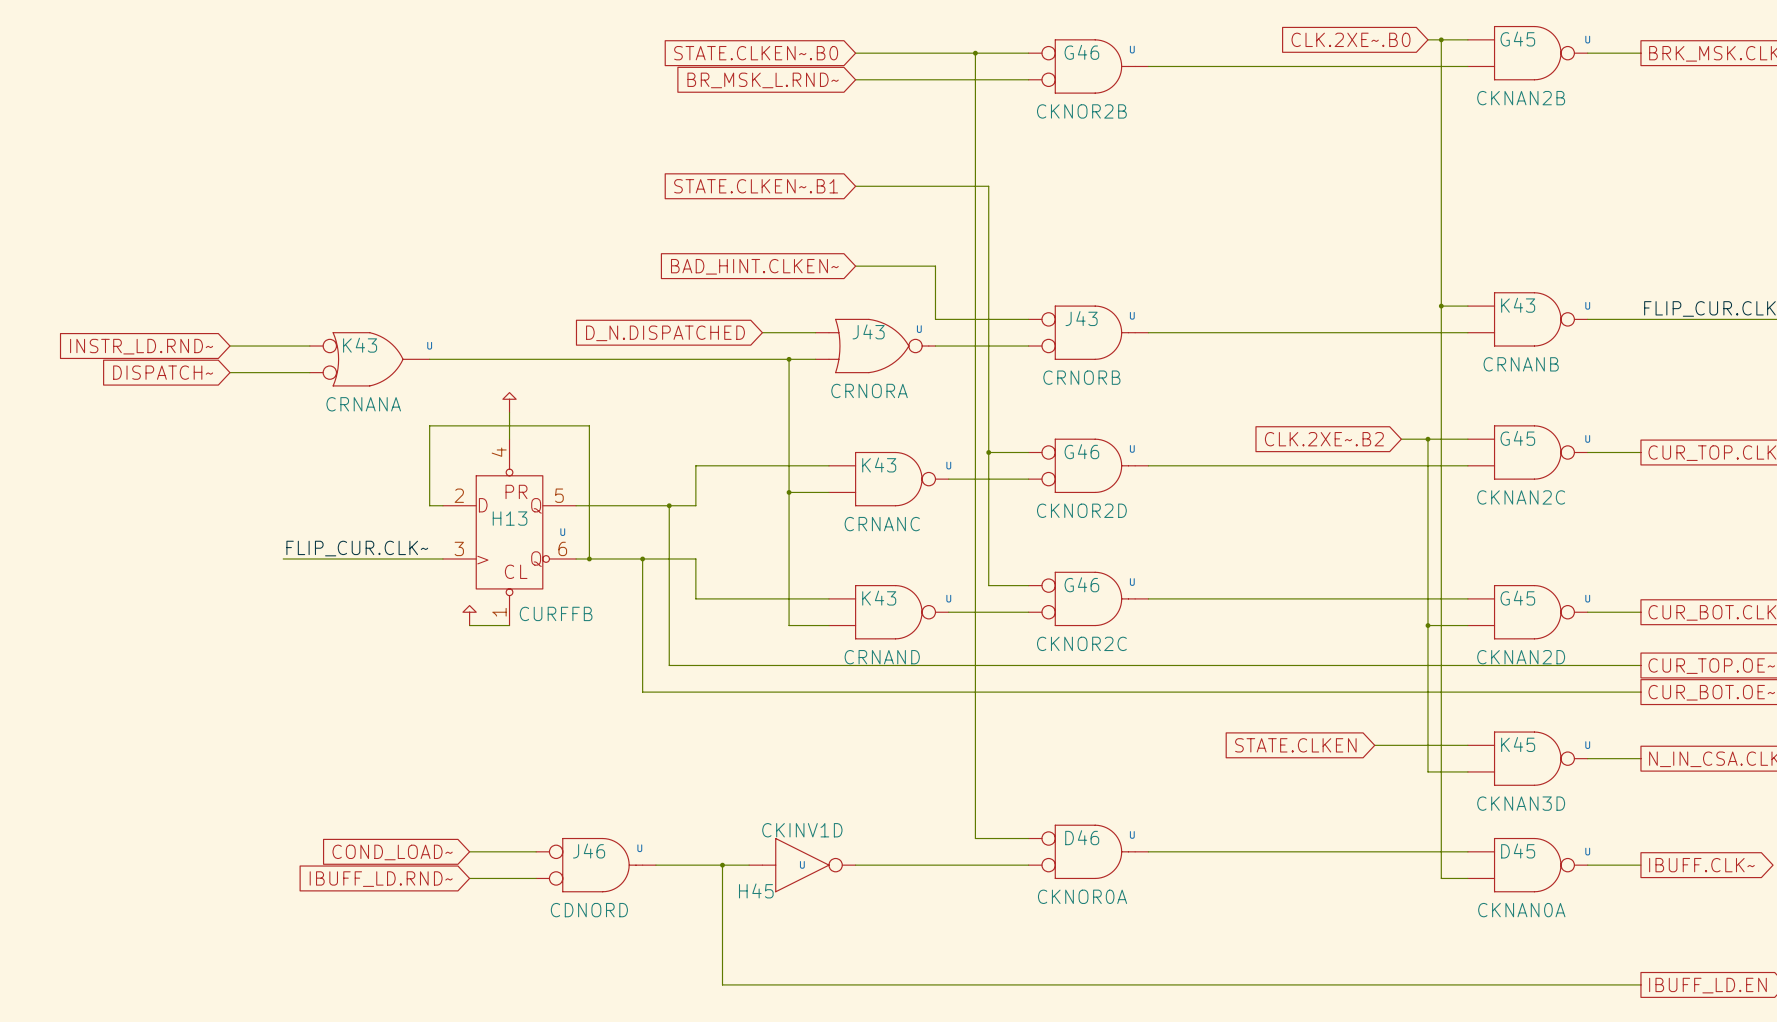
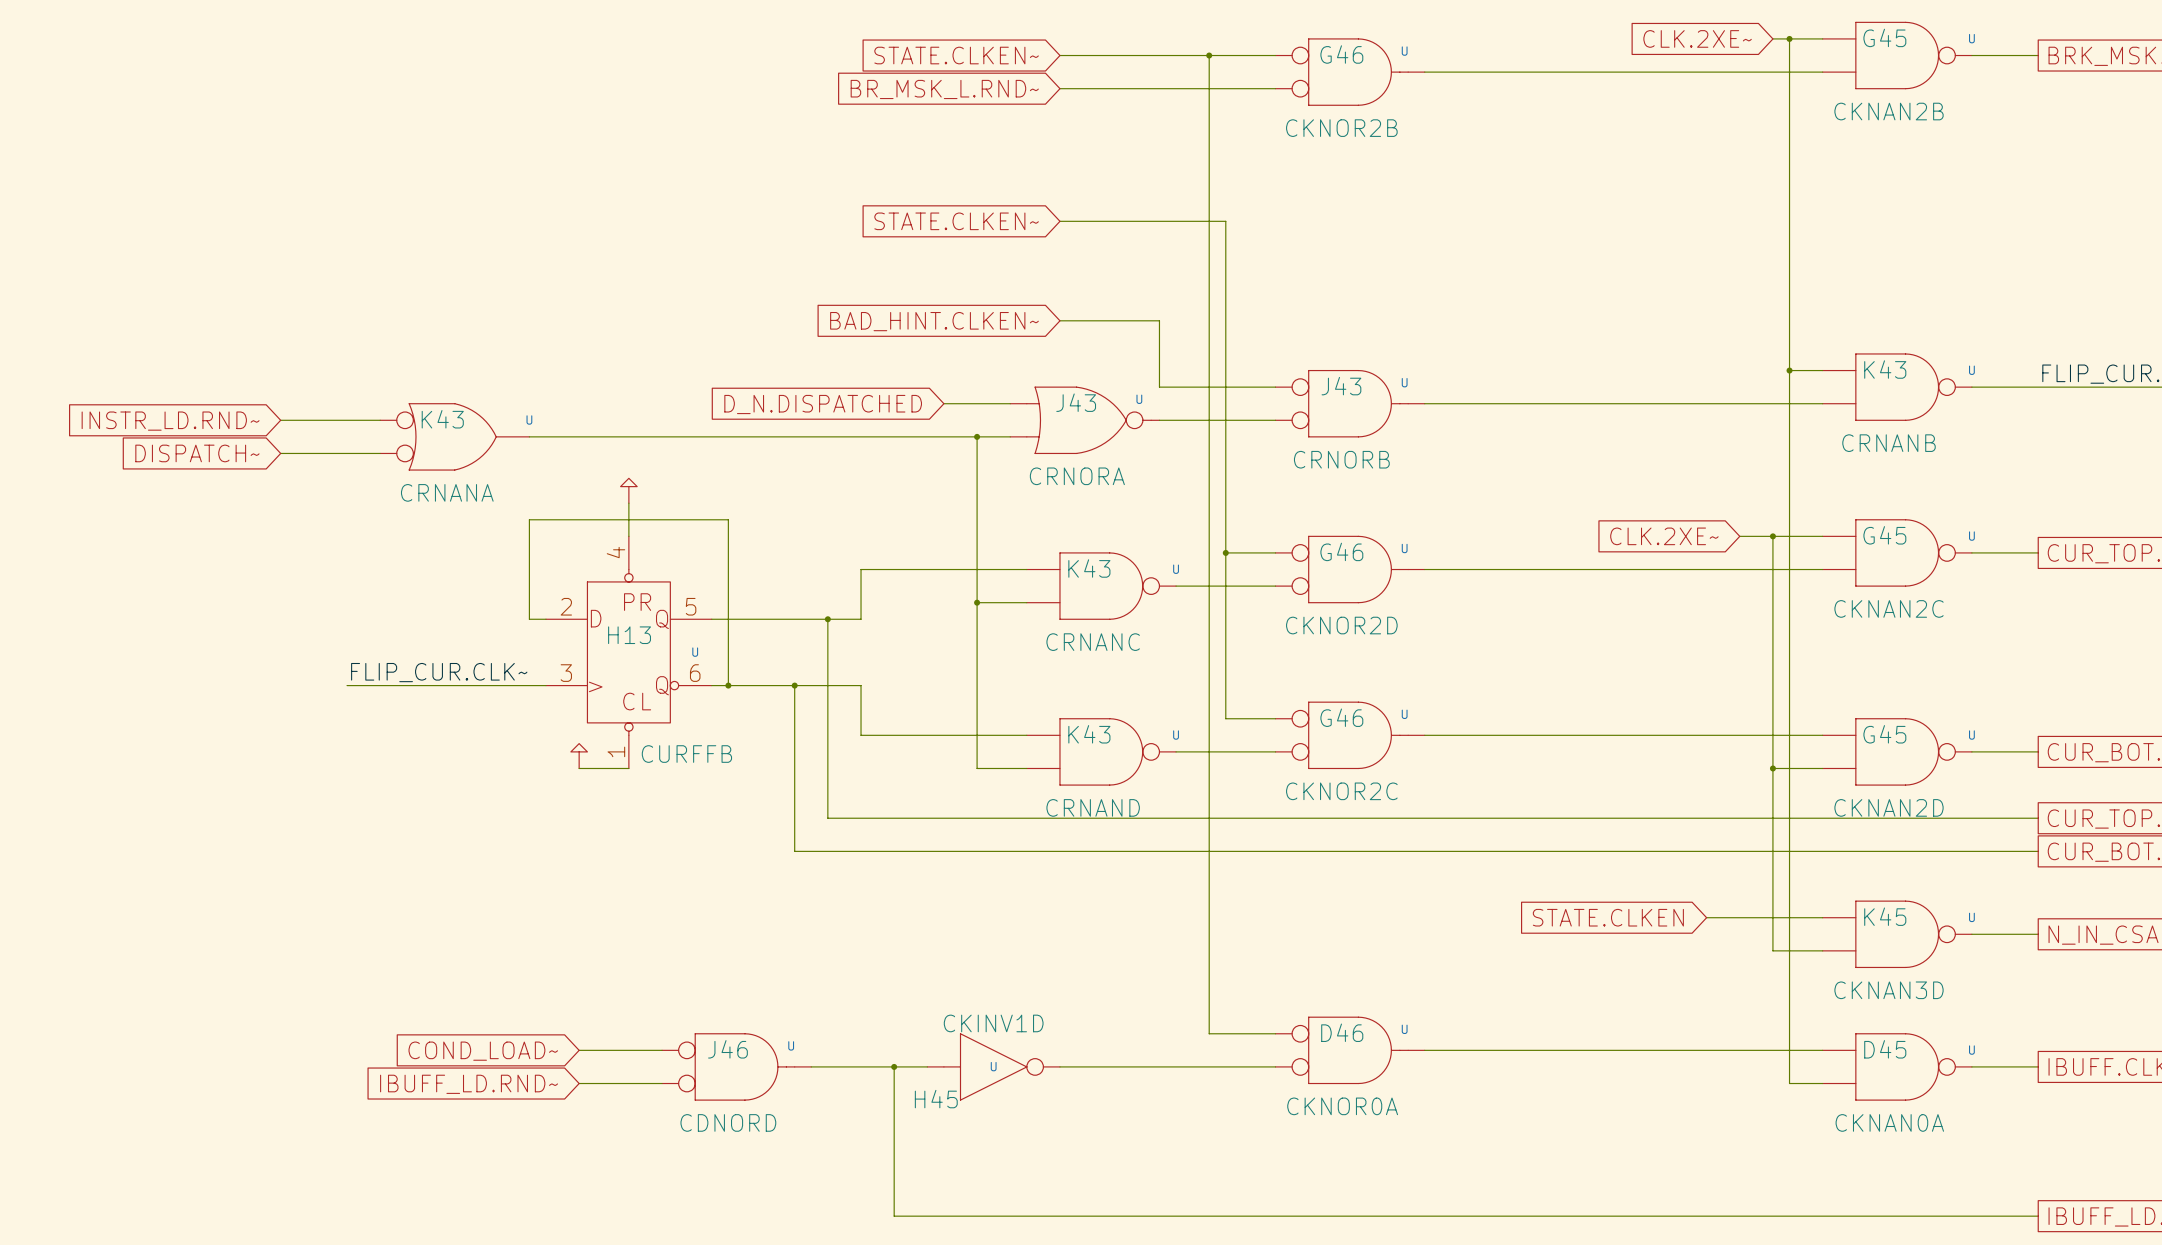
global label: CLK.2XE~.B0 (1351, 39) -> CLK.2XE~ (1697, 38)
global label: STATE.CLKEN~.B0 (756, 53) -> STATE.CLKEN~ (956, 55)
global label: STATE.CLKEN~.B1 (756, 186) -> STATE.CLKEN~ (956, 221)
global label: CLK.2XE~.B2 (1324, 439) -> CLK.2XE~ (1664, 536)

